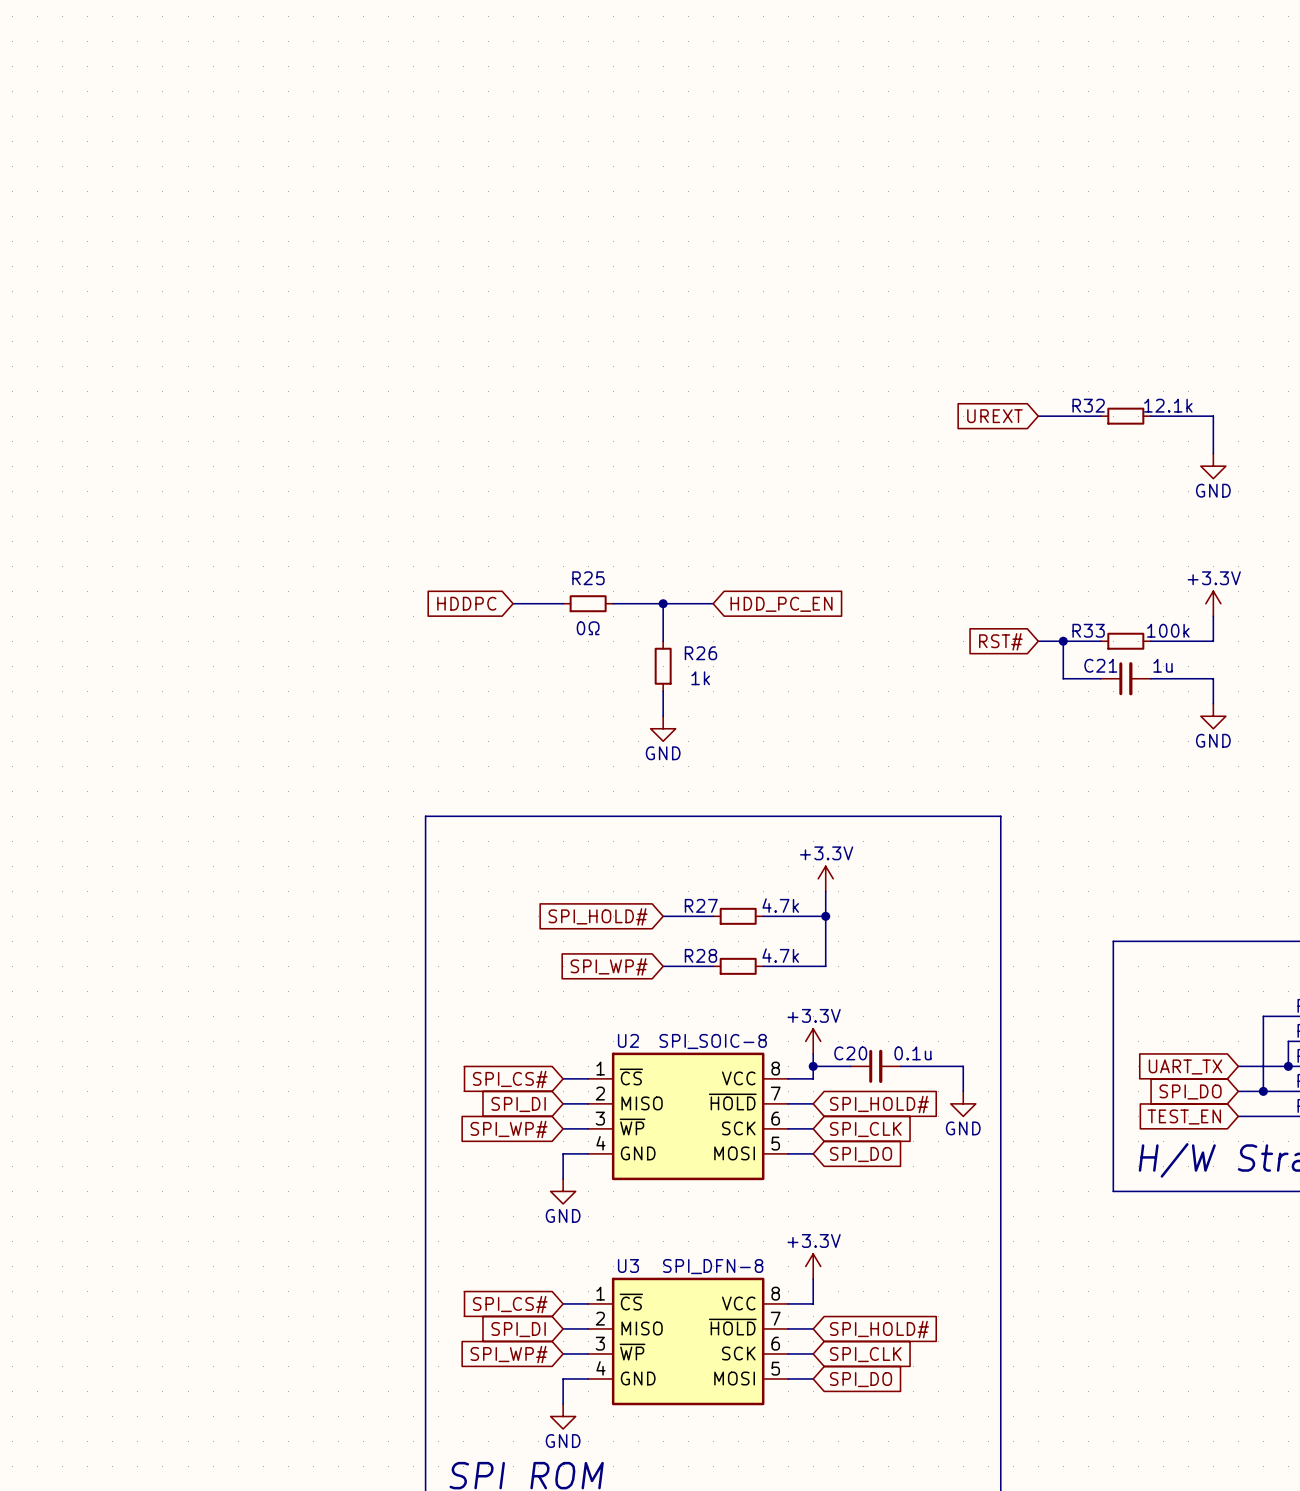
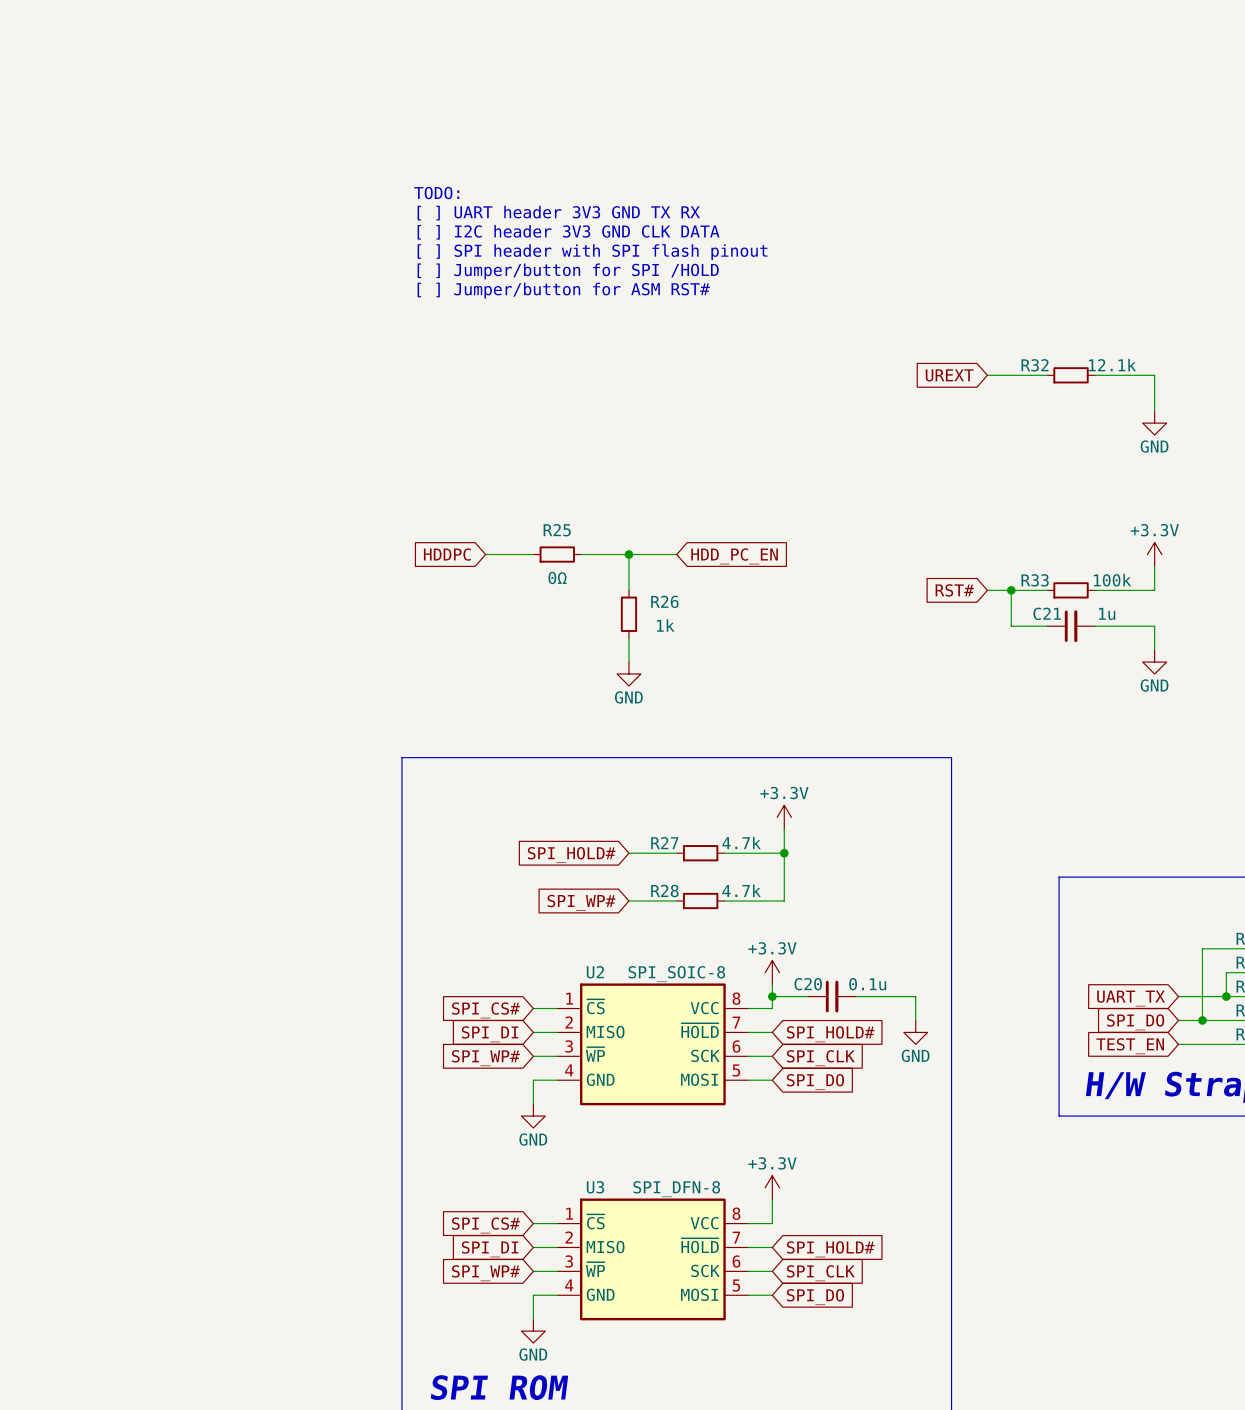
text: none -> TODO: (436, 193)
text: none -> [ ] UART header 3V3 GND TX RX (558, 213)
text: none -> [ ] I2C header 3V3 GND CLK DATA (568, 232)
text: none -> [ ] SPI header with SPI flash pinout (592, 252)
text: none -> [ ] Jumper/button for SPI /HOLD (568, 271)
text: none -> [ ] Jumper/button for ASM RST# (563, 290)

